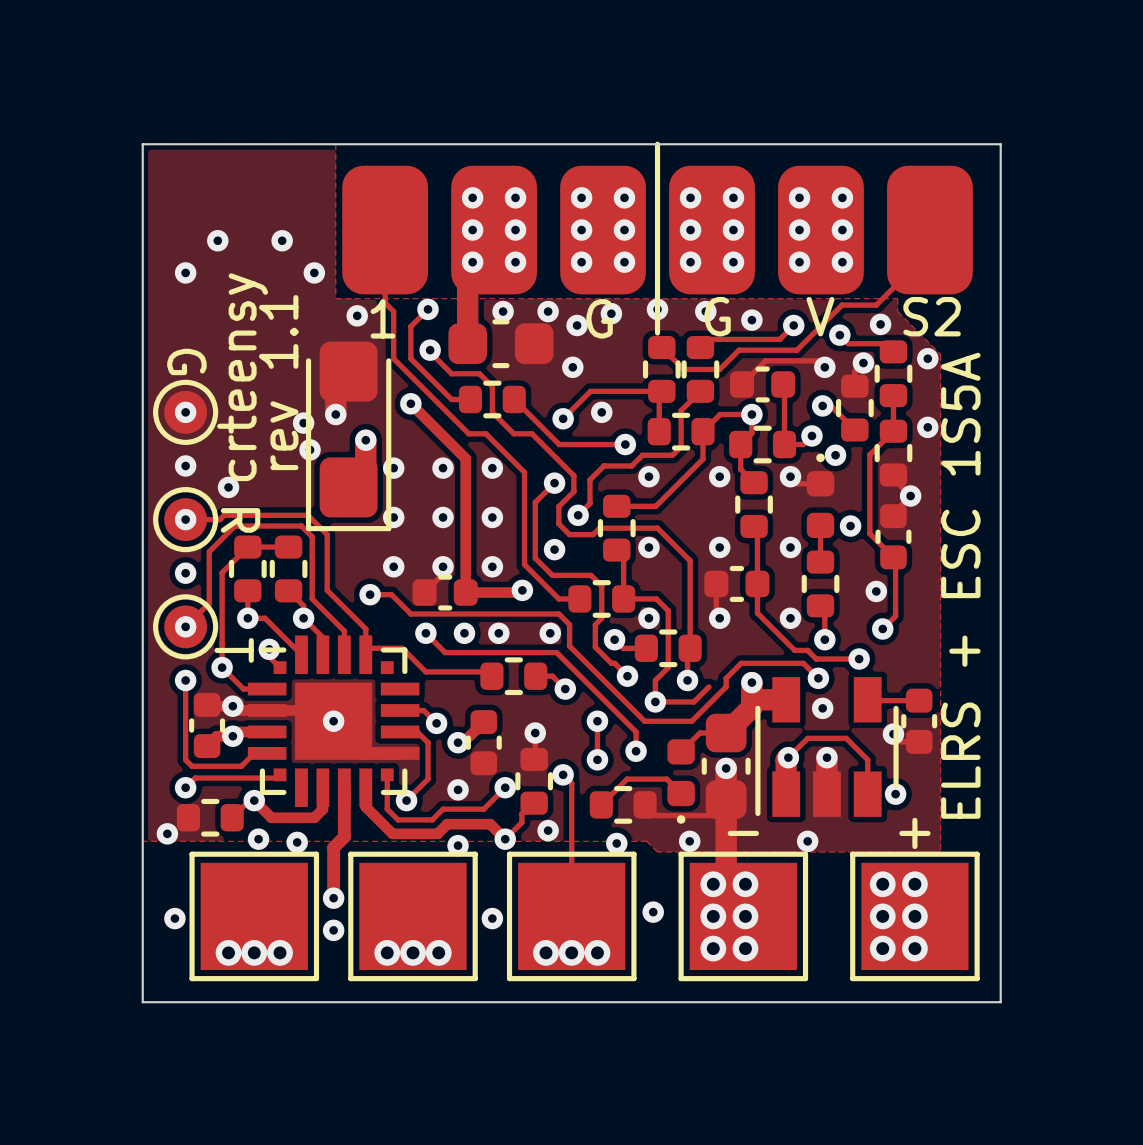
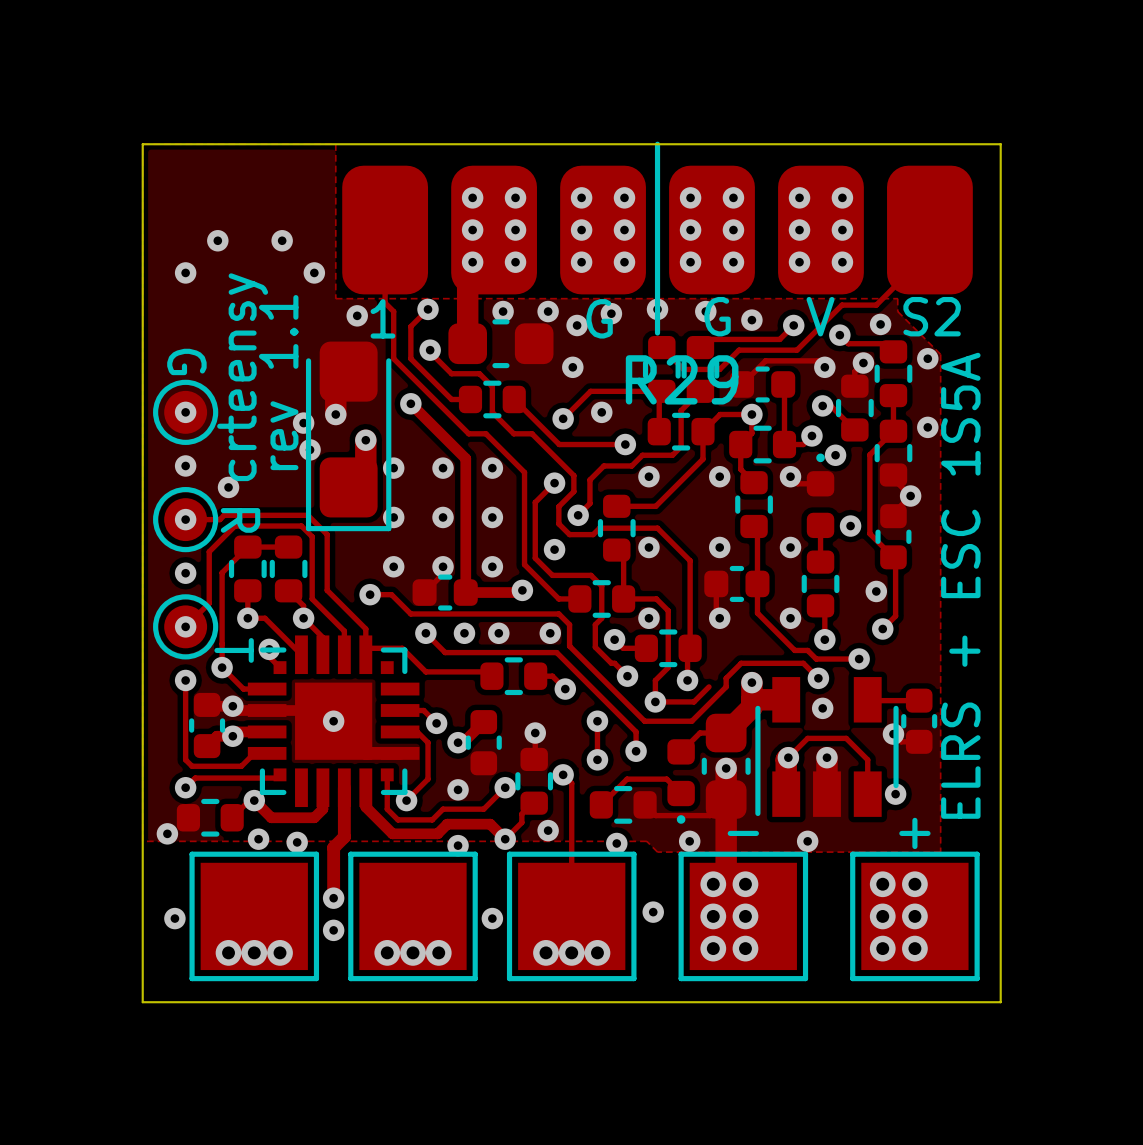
R29 name: none -> R29 (682, 379)

